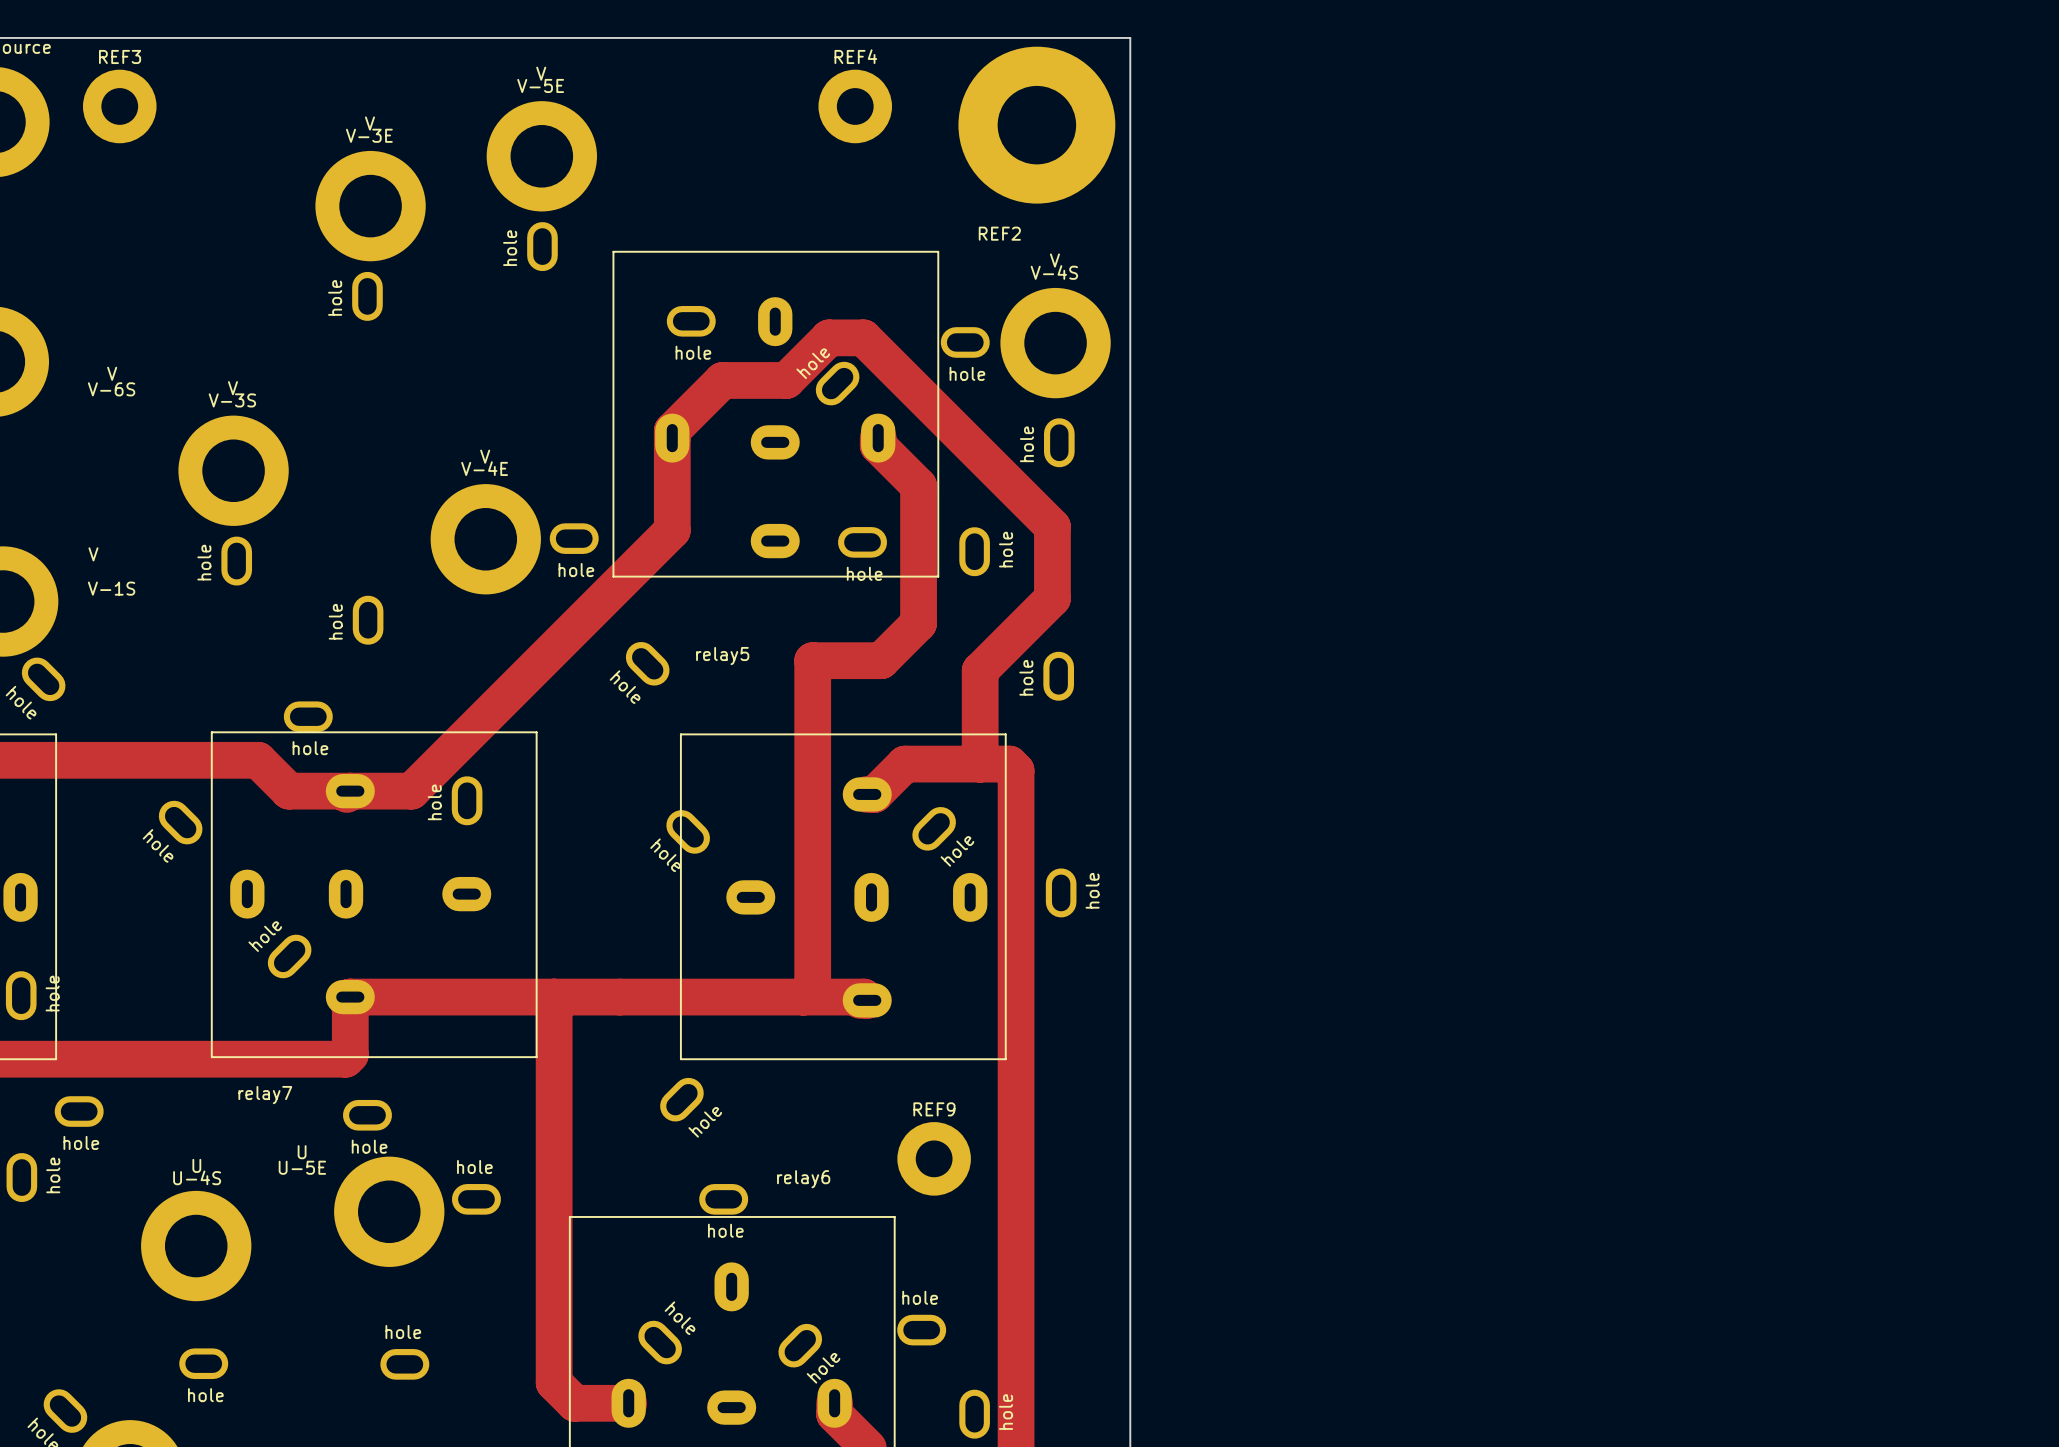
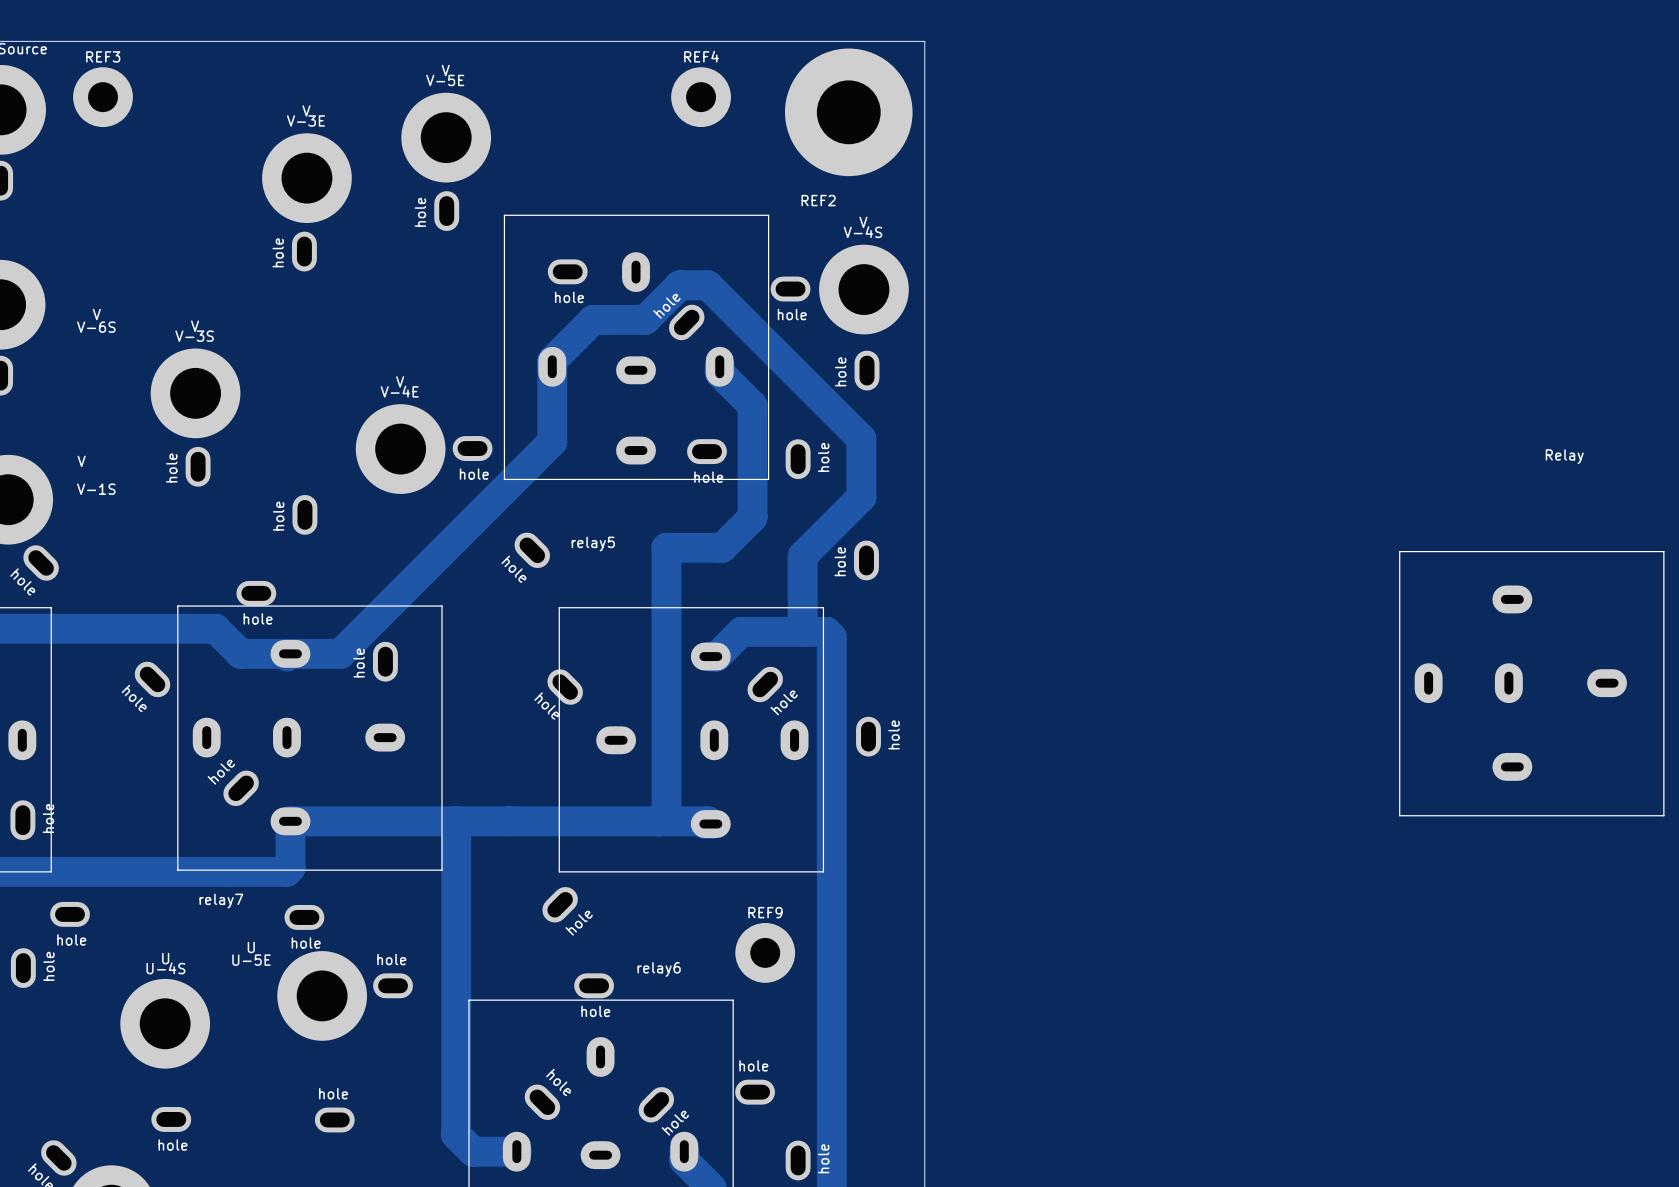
Relay: none -> (1531, 683)

